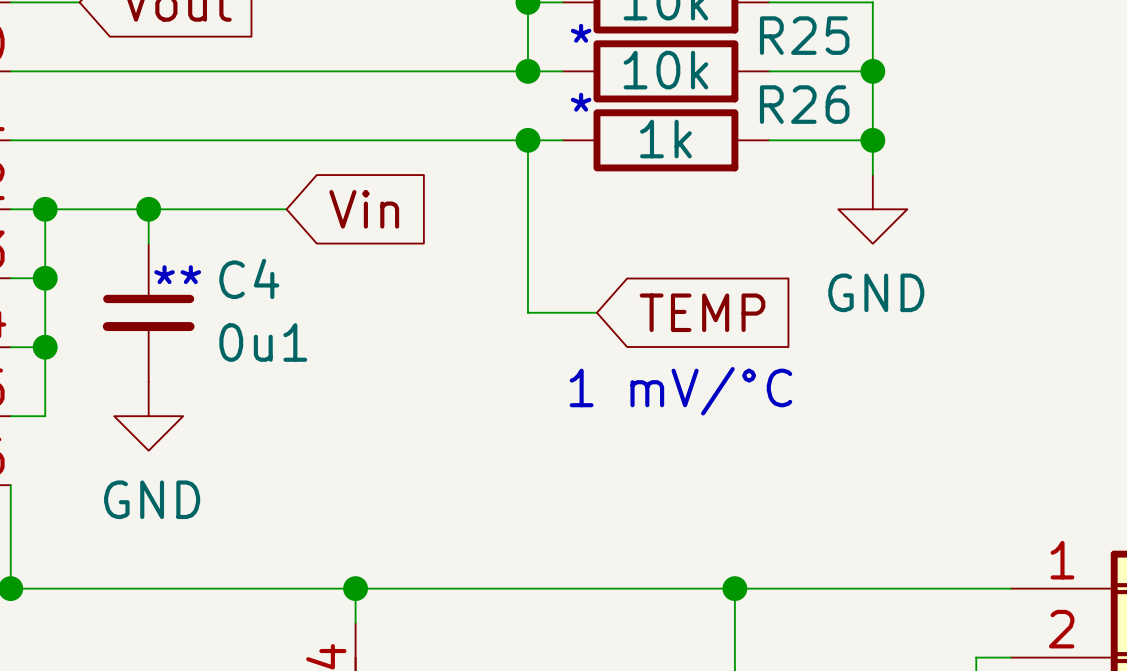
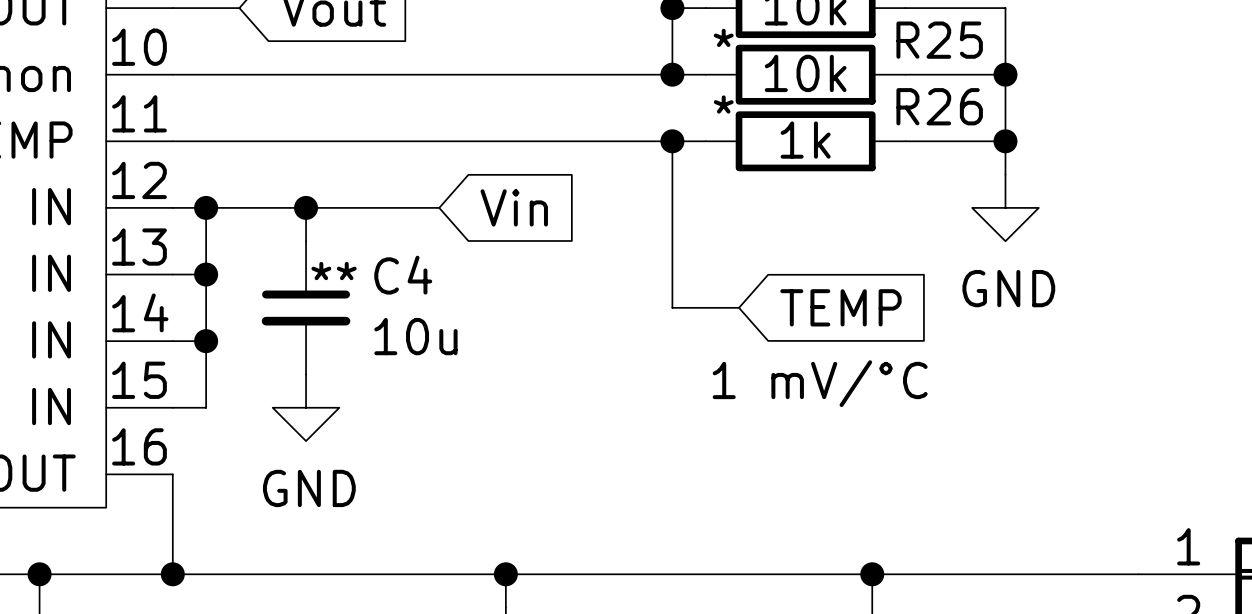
C4 value: 0u1 (263, 342) -> 10u (415, 336)

